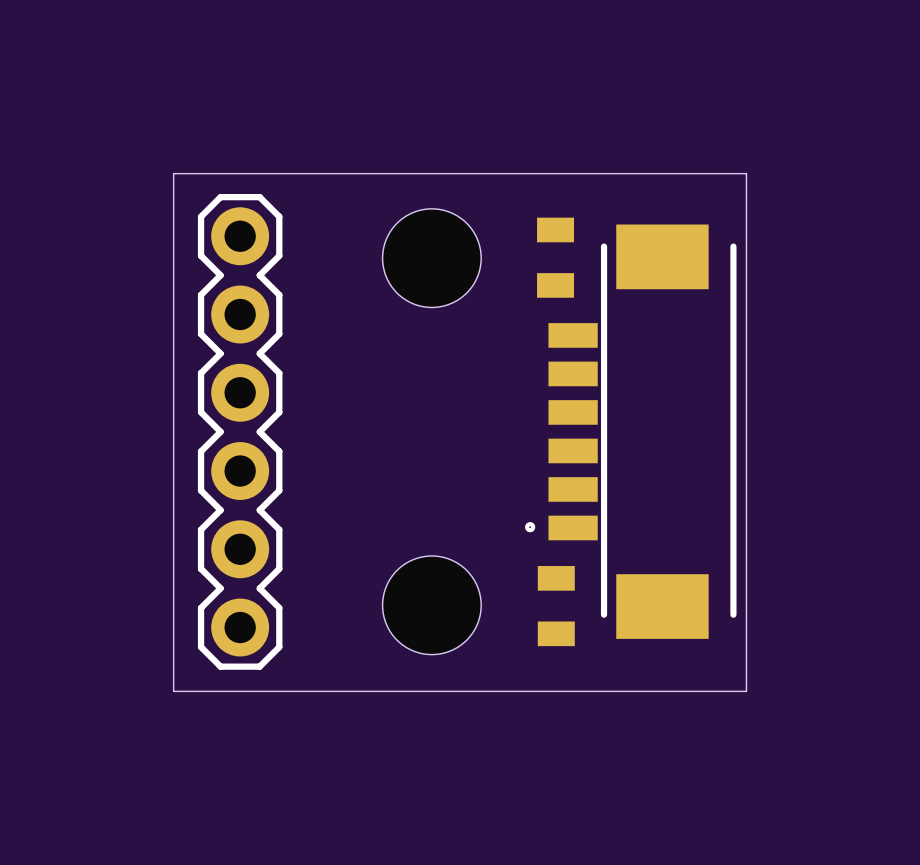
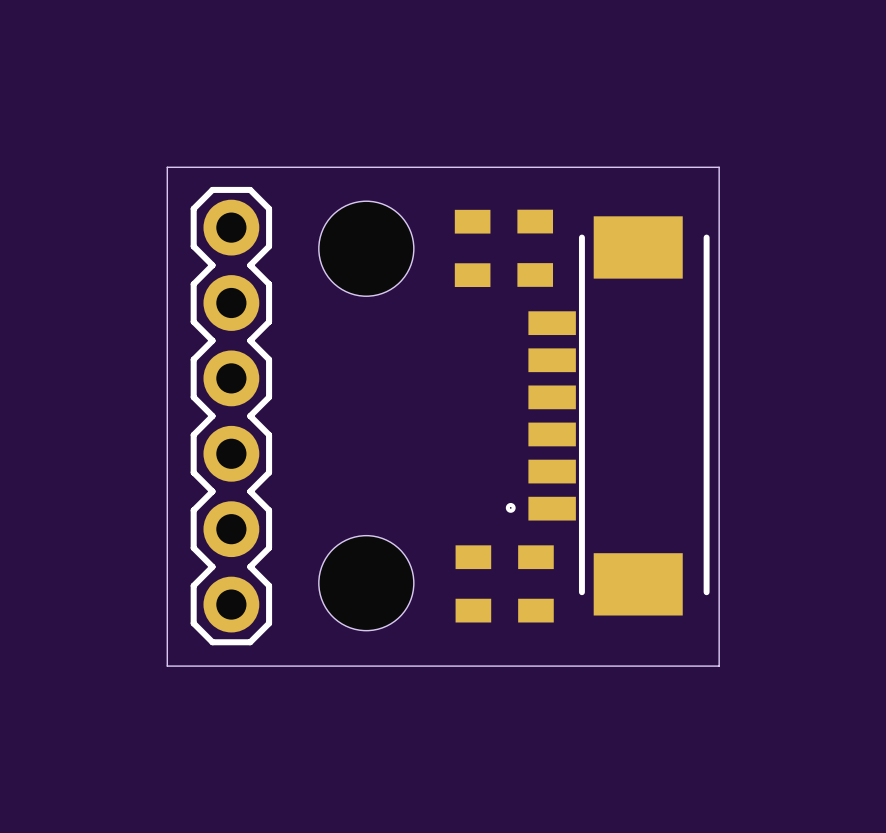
part: none -> (472, 248)
hole position: (431, 258) -> (366, 248)
hole position: (431, 605) -> (366, 583)
part: none -> (473, 583)

